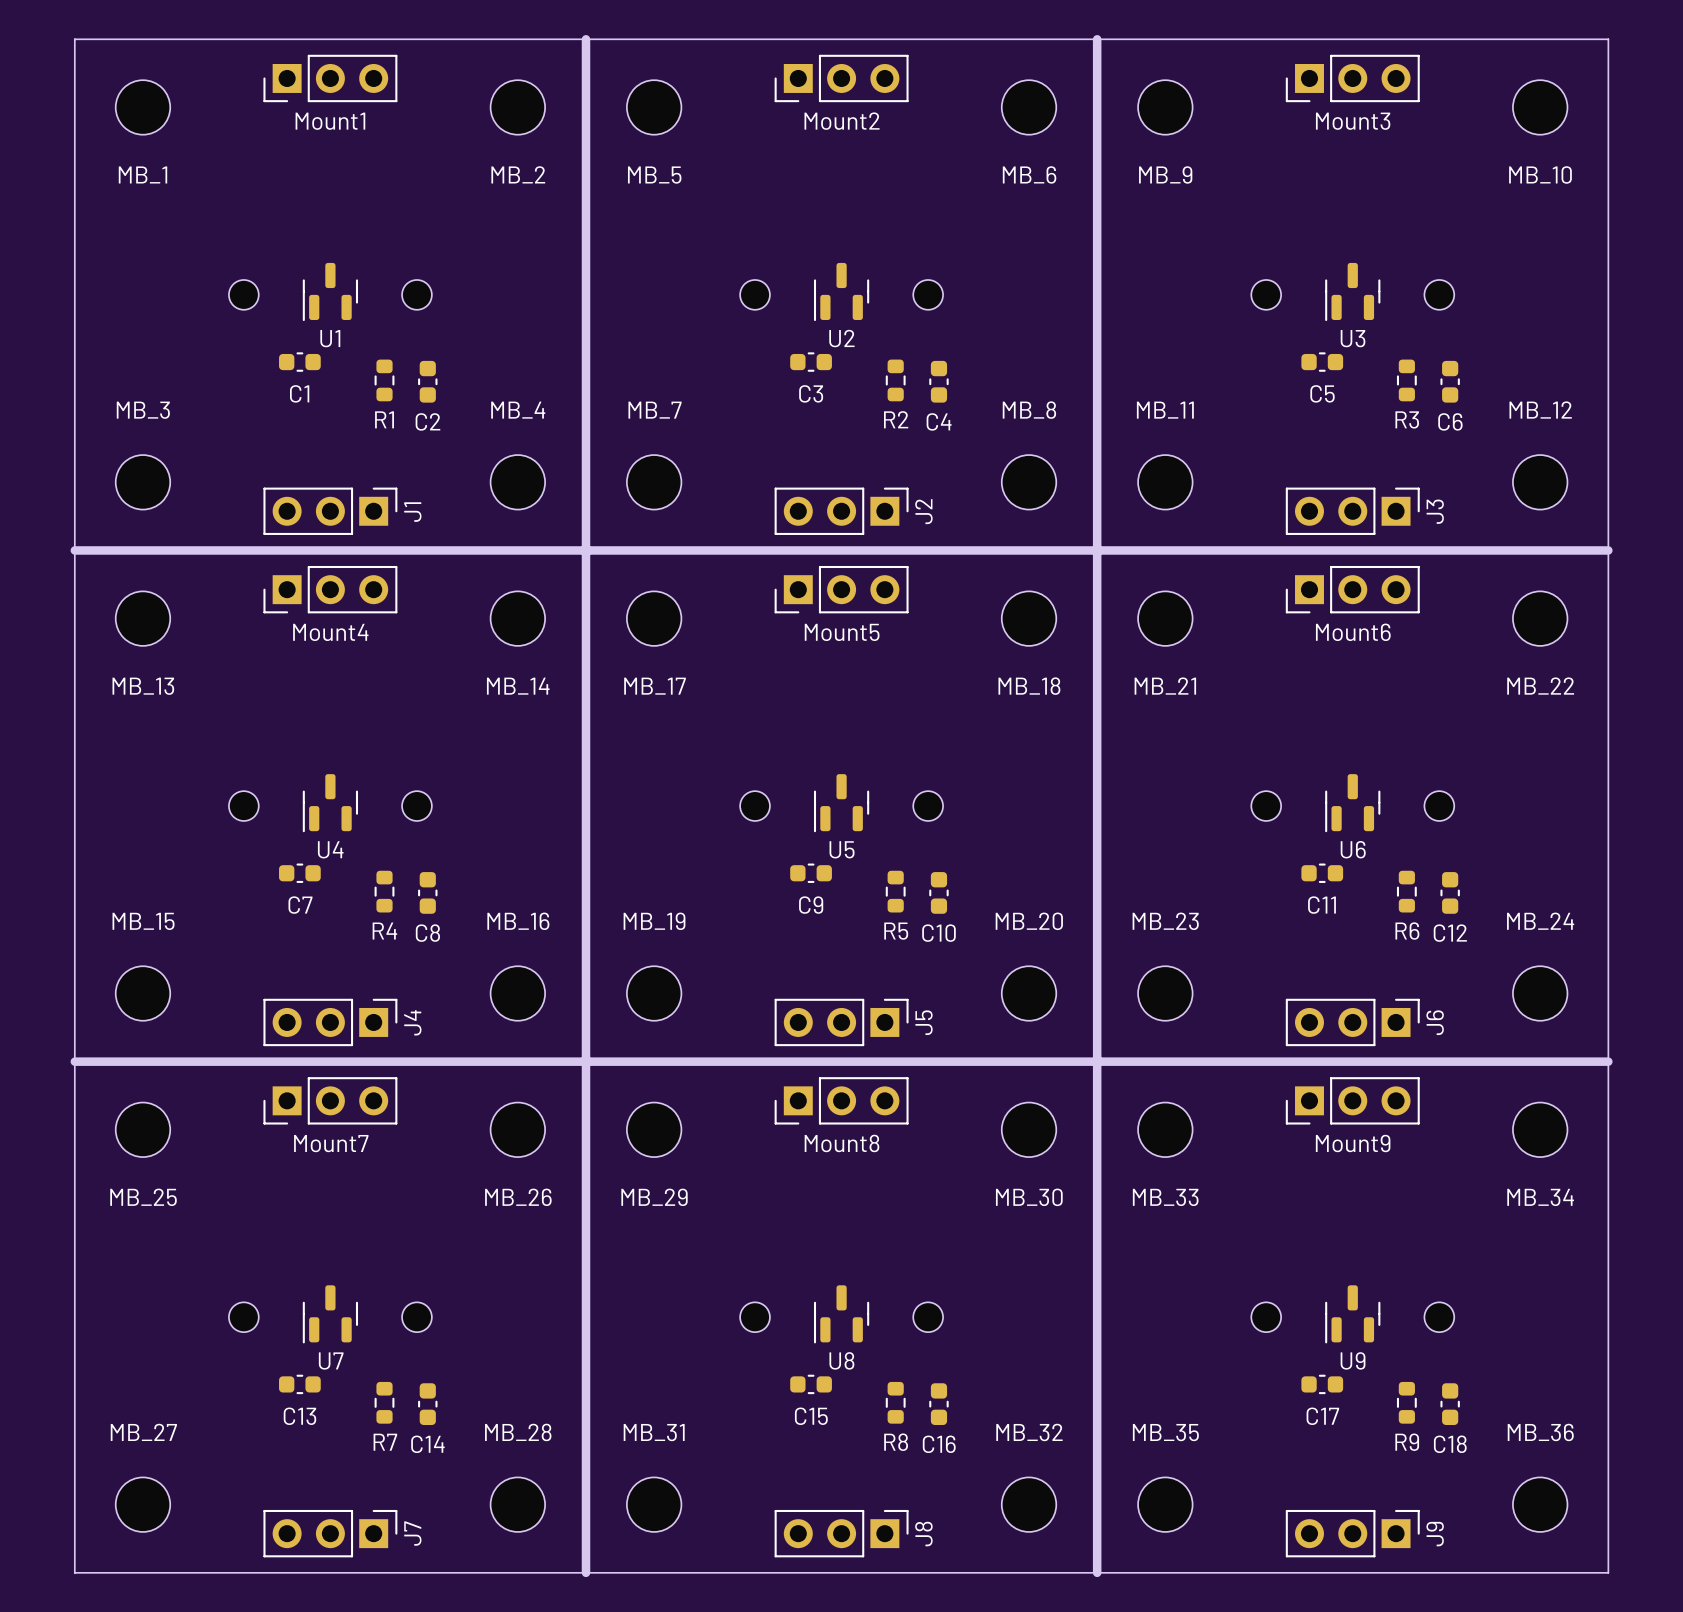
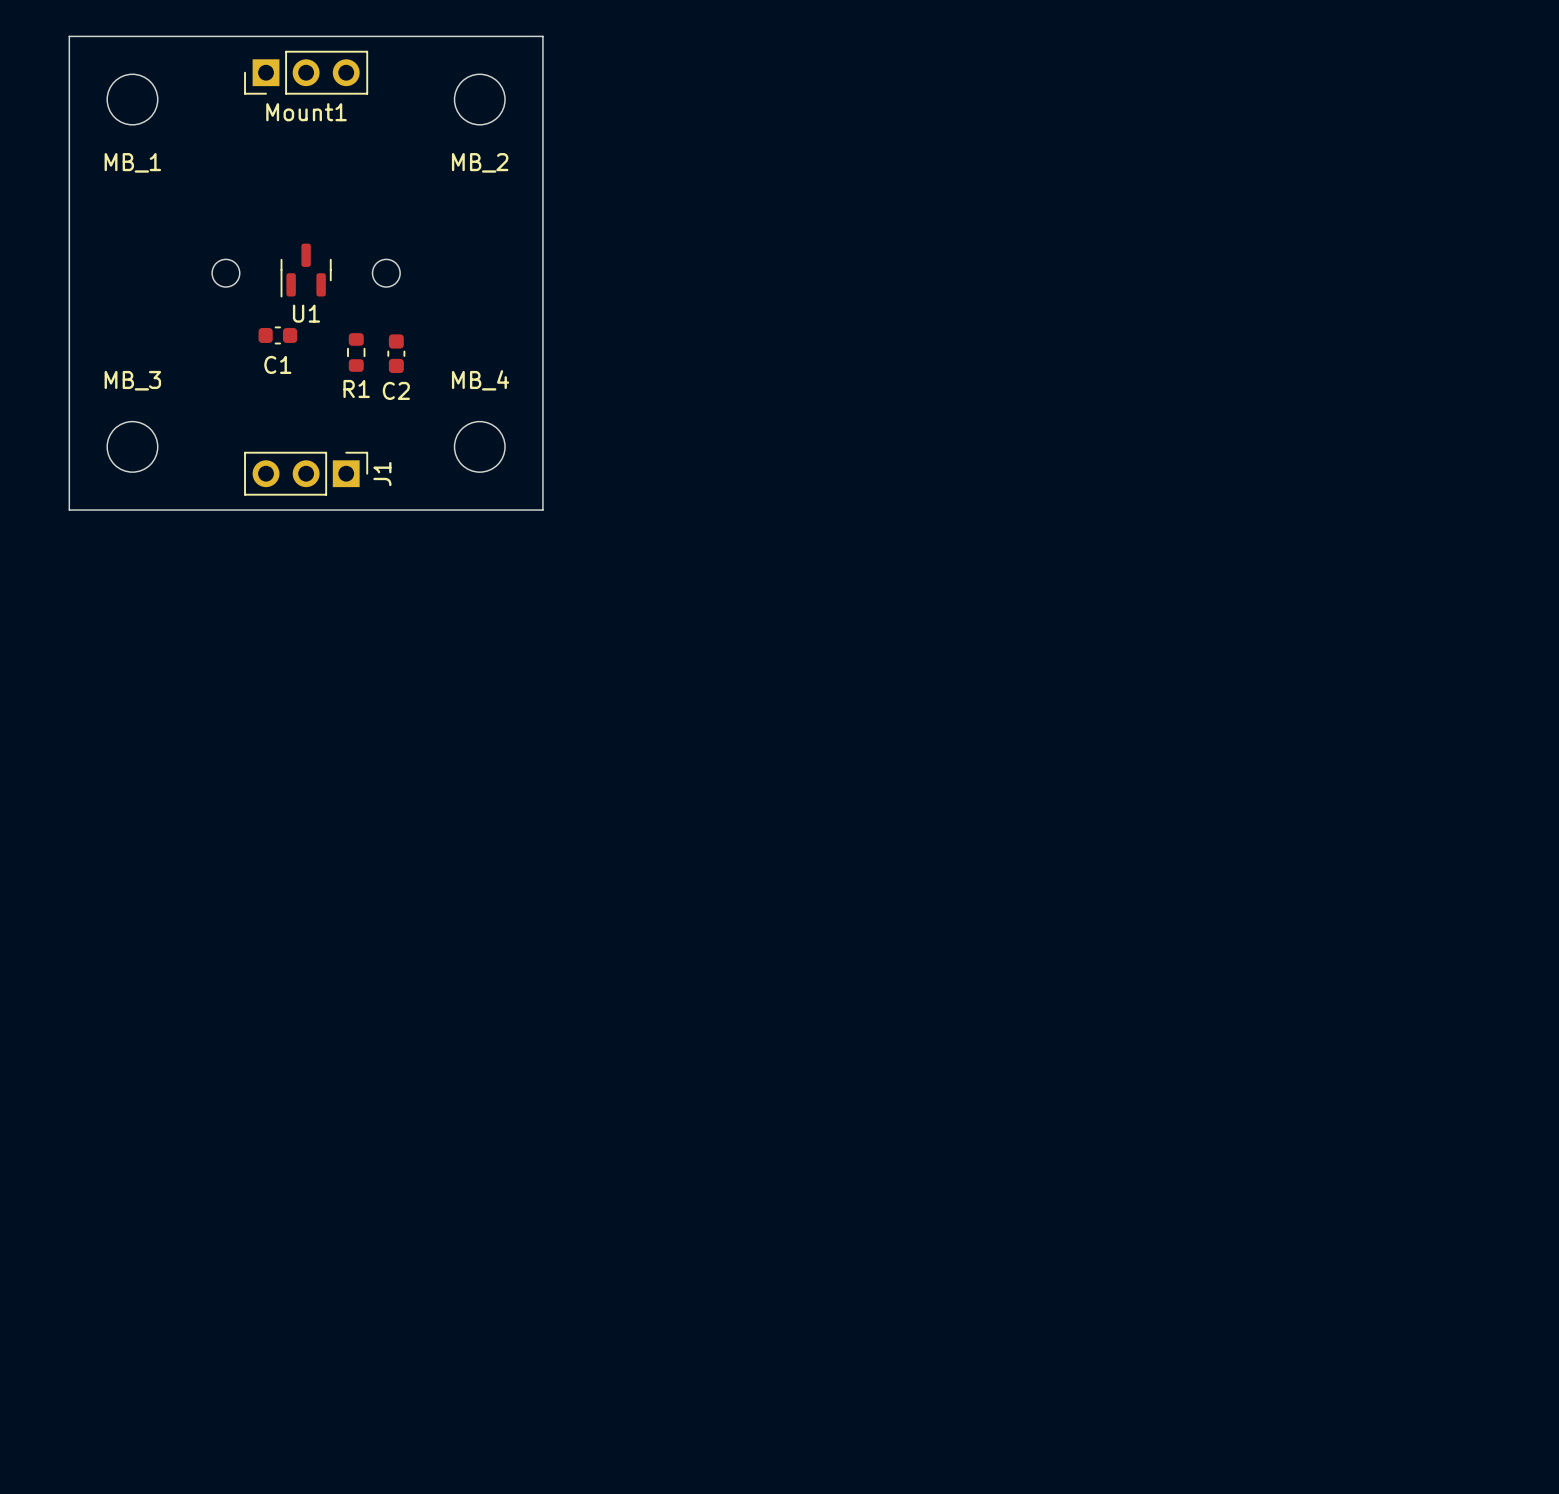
board edge: (586, 39) (1608, 39) (1608, 1572) (74, 1572) (74, 550) -> none
board edge width: thick (586, 39) (586, 550) (74, 550) -> thin (542, 36) (542, 510) (69, 510)
board edge: (1097, 39) (1097, 1572) -> none
Mount2: (841, 78) -> none
Mount3: (1352, 78) -> none
MB_5: (654, 107) -> none
MB_6: (1029, 107) -> none
MB_9: (1165, 107) -> none
MB_10: (1540, 107) -> none
U2: (841, 291) -> none
U3: (1352, 291) -> none
C3: (811, 362) -> none
C5: (1322, 362) -> none
R2: (895, 380) -> none
R3: (1406, 380) -> none
C4: (938, 381) -> none
C6: (1450, 381) -> none
MB_7: (654, 482) -> none
MB_8: (1029, 482) -> none
MB_11: (1165, 482) -> none
MB_12: (1540, 482) -> none
J2: (841, 511) -> none
J3: (1352, 511) -> none
board edge: (1608, 550) (586, 550) (586, 1572) -> none
Mount4: (330, 589) -> none
Mount5: (841, 589) -> none
Mount6: (1352, 589) -> none
MB_13: (142, 618) -> none
MB_14: (517, 618) -> none
MB_17: (654, 618) -> none
MB_18: (1029, 618) -> none
MB_21: (1165, 618) -> none
MB_22: (1540, 618) -> none
U4: (330, 803) -> none
U5: (841, 803) -> none
U6: (1352, 803) -> none
C7: (299, 873) -> none
C9: (811, 873) -> none
C11: (1322, 873) -> none
R4: (384, 891) -> none
R5: (895, 891) -> none
R6: (1406, 891) -> none
C8: (427, 892) -> none
C10: (938, 892) -> none
C12: (1450, 892) -> none
MB_15: (142, 993) -> none
MB_16: (517, 993) -> none
MB_19: (654, 993) -> none
MB_20: (1029, 993) -> none
MB_23: (1165, 993) -> none
MB_24: (1540, 993) -> none
J4: (330, 1022) -> none
J5: (841, 1022) -> none
J6: (1352, 1022) -> none
board edge: (74, 1061) (1608, 1061) -> none
Mount7: (330, 1100) -> none
Mount8: (841, 1100) -> none
Mount9: (1352, 1100) -> none
MB_25: (142, 1129) -> none
MB_26: (517, 1129) -> none
MB_29: (654, 1129) -> none
MB_30: (1029, 1129) -> none
MB_33: (1165, 1129) -> none
MB_34: (1540, 1129) -> none
U7: (330, 1314) -> none
U8: (841, 1314) -> none
U9: (1352, 1314) -> none
C13: (299, 1384) -> none
C15: (811, 1384) -> none
C17: (1322, 1384) -> none
R7: (384, 1402) -> none
R8: (895, 1402) -> none
R9: (1406, 1402) -> none
C14: (427, 1404) -> none
C16: (938, 1404) -> none
C18: (1450, 1404) -> none
MB_27: (142, 1504) -> none
MB_28: (517, 1504) -> none
MB_31: (654, 1504) -> none
MB_32: (1029, 1504) -> none
MB_35: (1165, 1504) -> none
MB_36: (1540, 1504) -> none
J7: (330, 1533) -> none
J8: (841, 1533) -> none
J9: (1352, 1533) -> none

